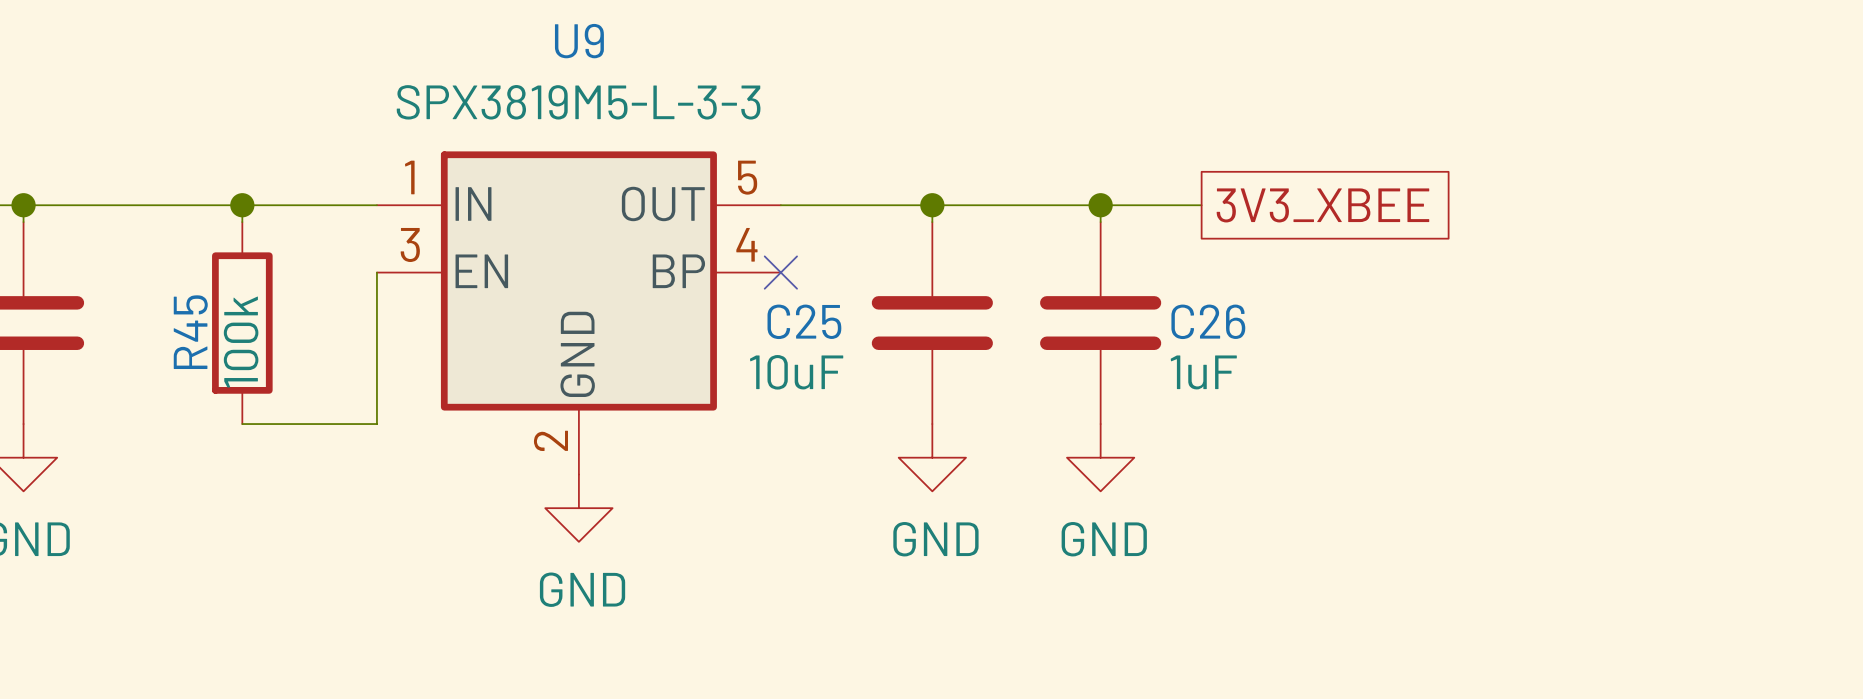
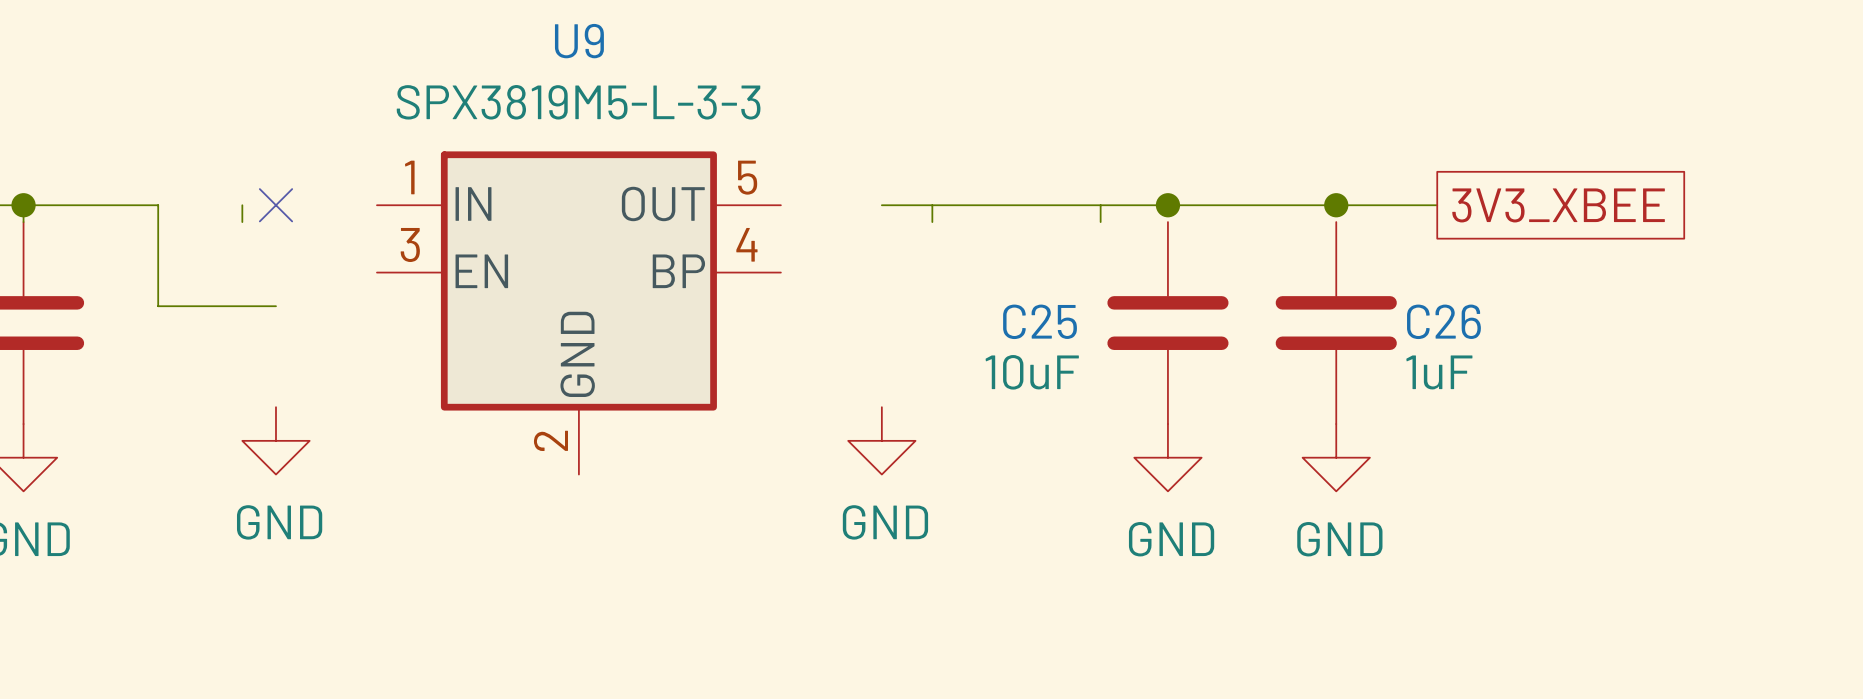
wire: (158, 205) (376, 205) -> (158, 205) (158, 306) (275, 306)
junction: (242, 205) -> none
no-connect mark: none -> (275, 205)
wire: (780, 205) (881, 205) -> none
junction: (932, 205) -> none
junction position: (1100, 205) -> (1167, 205)
wire: none -> (1201, 205) (1437, 205)
global label position: 3V3_XBEE (1322, 205) -> 3V3_XBEE (1558, 205)
junction: none -> (1336, 205)
wire: (376, 272) (376, 424) (242, 424) -> none
no-connect mark: (780, 272) -> none
R45: (242, 323) -> none
C25 position: (932, 323) -> (1167, 323)
C26 position: (1100, 323) -> (1336, 323)
power symbol: none -> GND (275, 440)
power symbol position: GND (932, 457) -> GND (881, 440)
power symbol position: GND (1100, 457) -> GND (1167, 457)
power symbol: none -> GND (1336, 457)
power symbol: GND (578, 508) -> none

